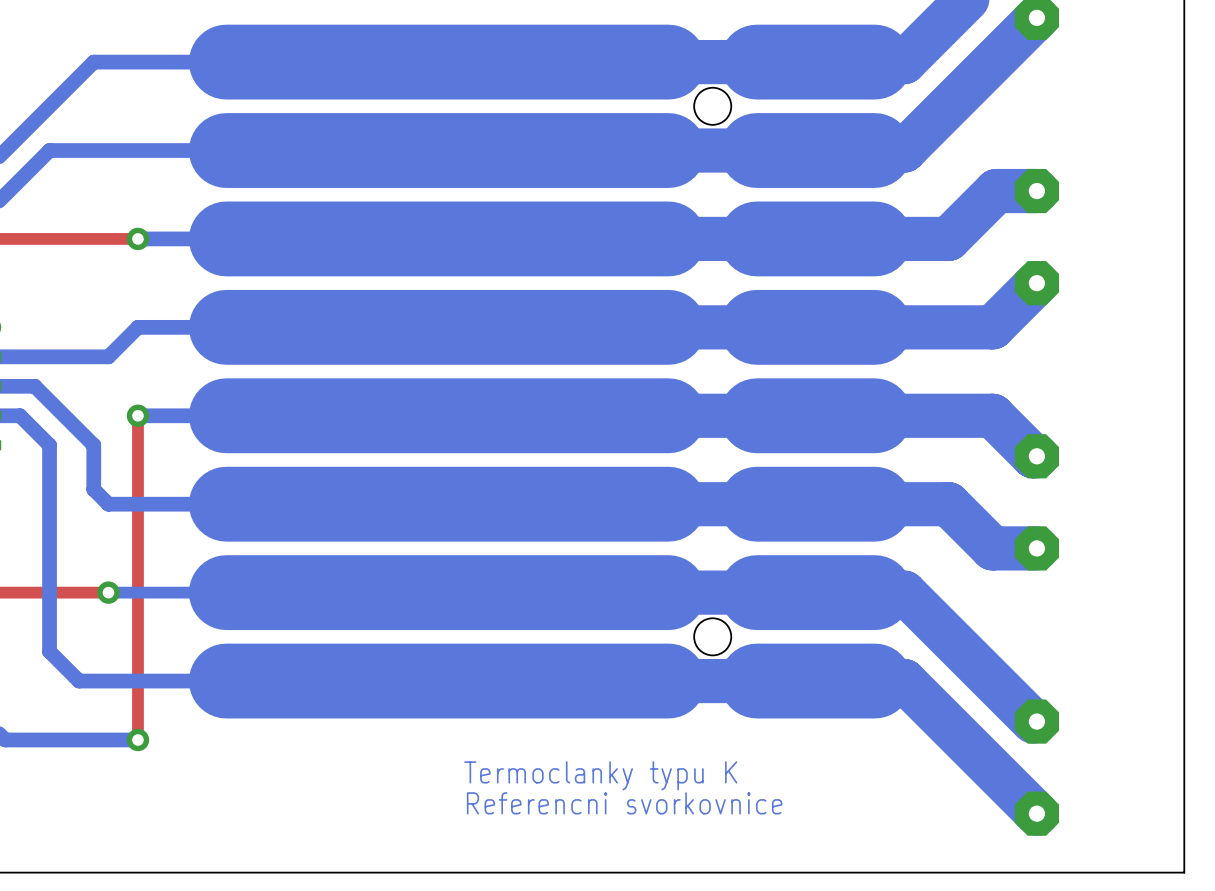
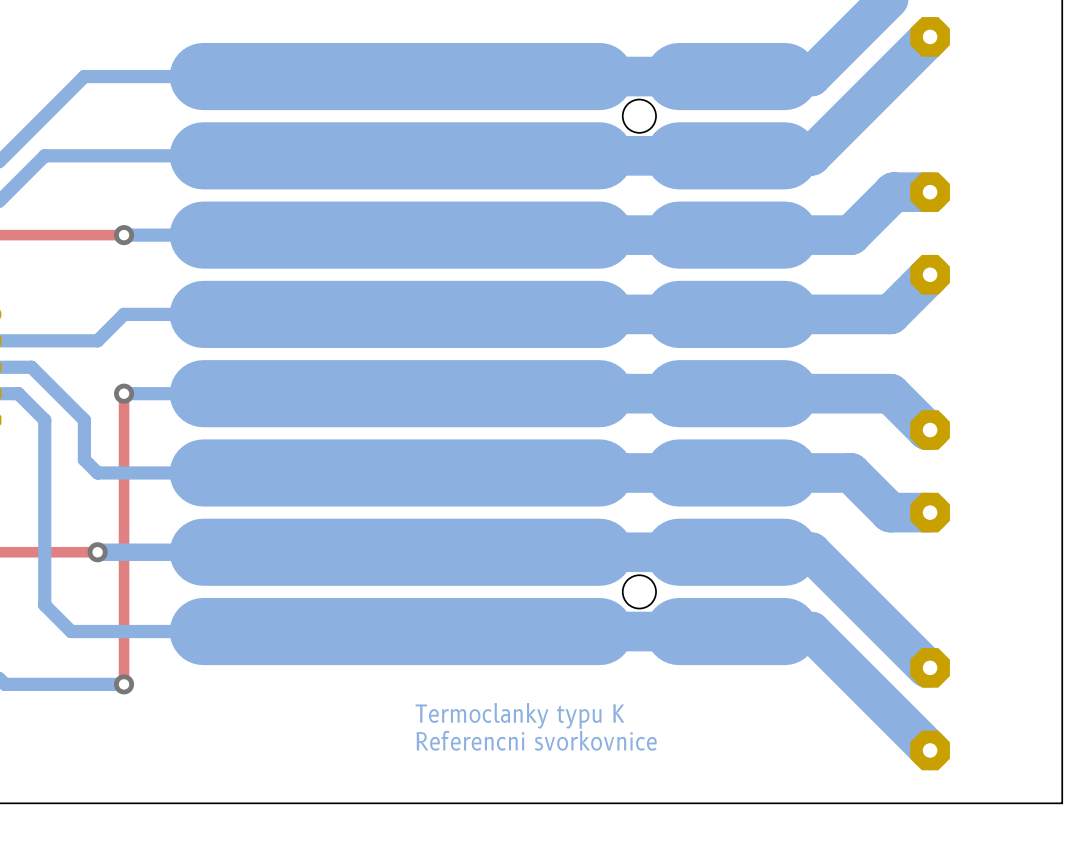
bottom track width: thin (226, 592) (108, 592) -> thick (203, 552) (97, 552)

